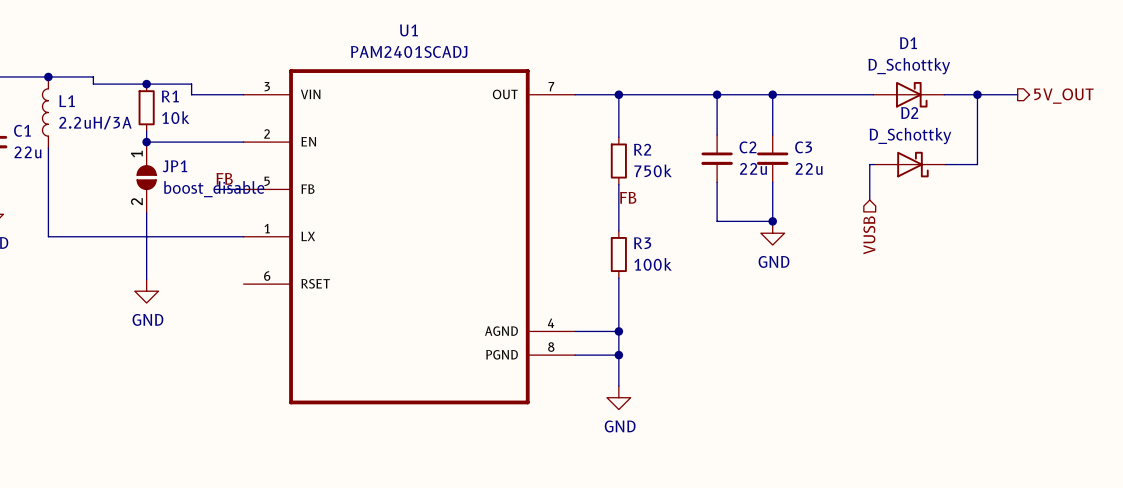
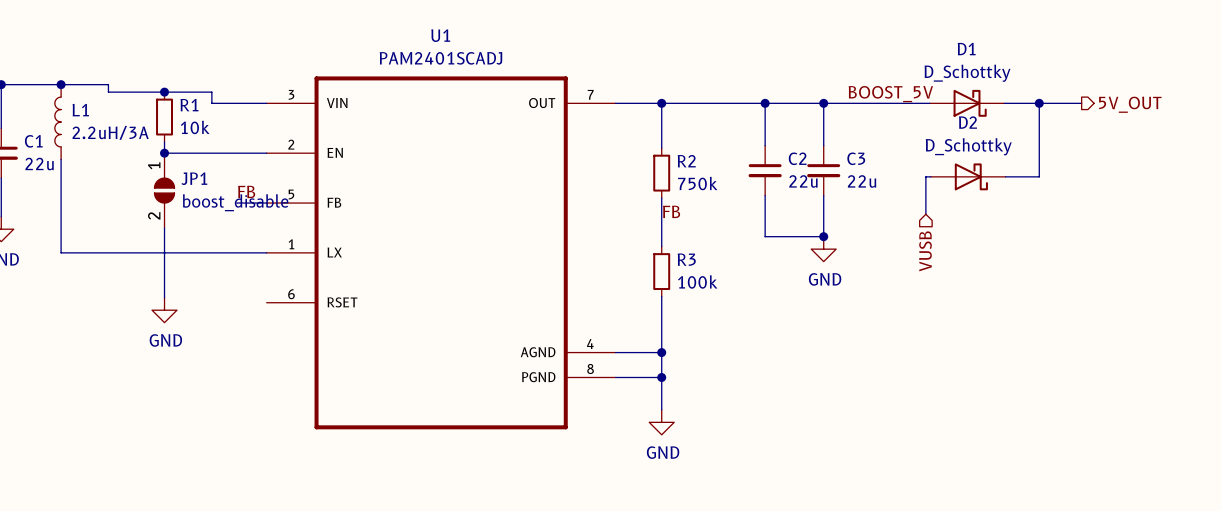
label: none -> BOOST_5V (890, 94)

